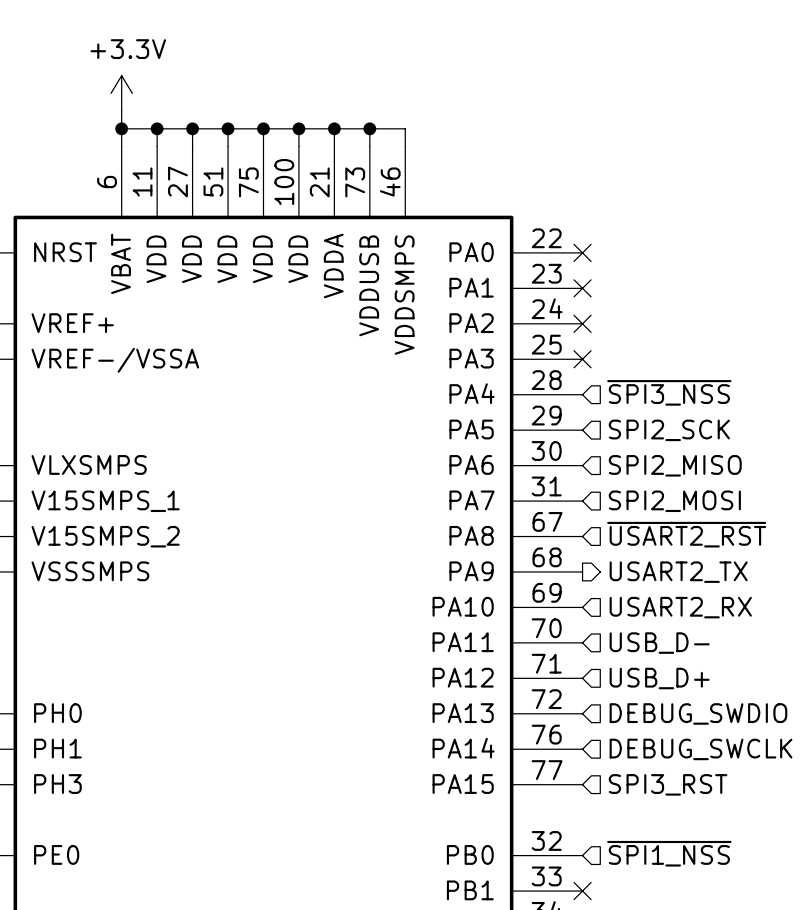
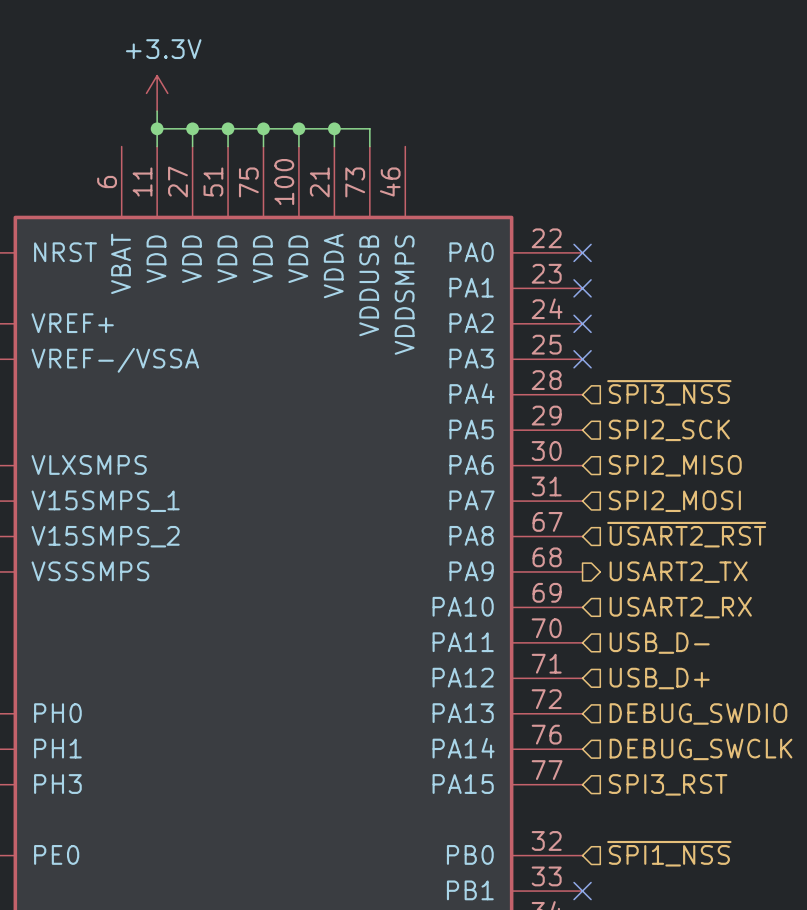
power symbol position: +3.3V (121, 93) -> +3.3V (157, 93)
wire: (121, 111) (121, 146) -> none
wire: (121, 128) (157, 128) -> (157, 111) (157, 128)
junction: (121, 128) -> none
wire: (369, 128) (405, 128) (405, 146) -> none
junction: (369, 128) -> none

